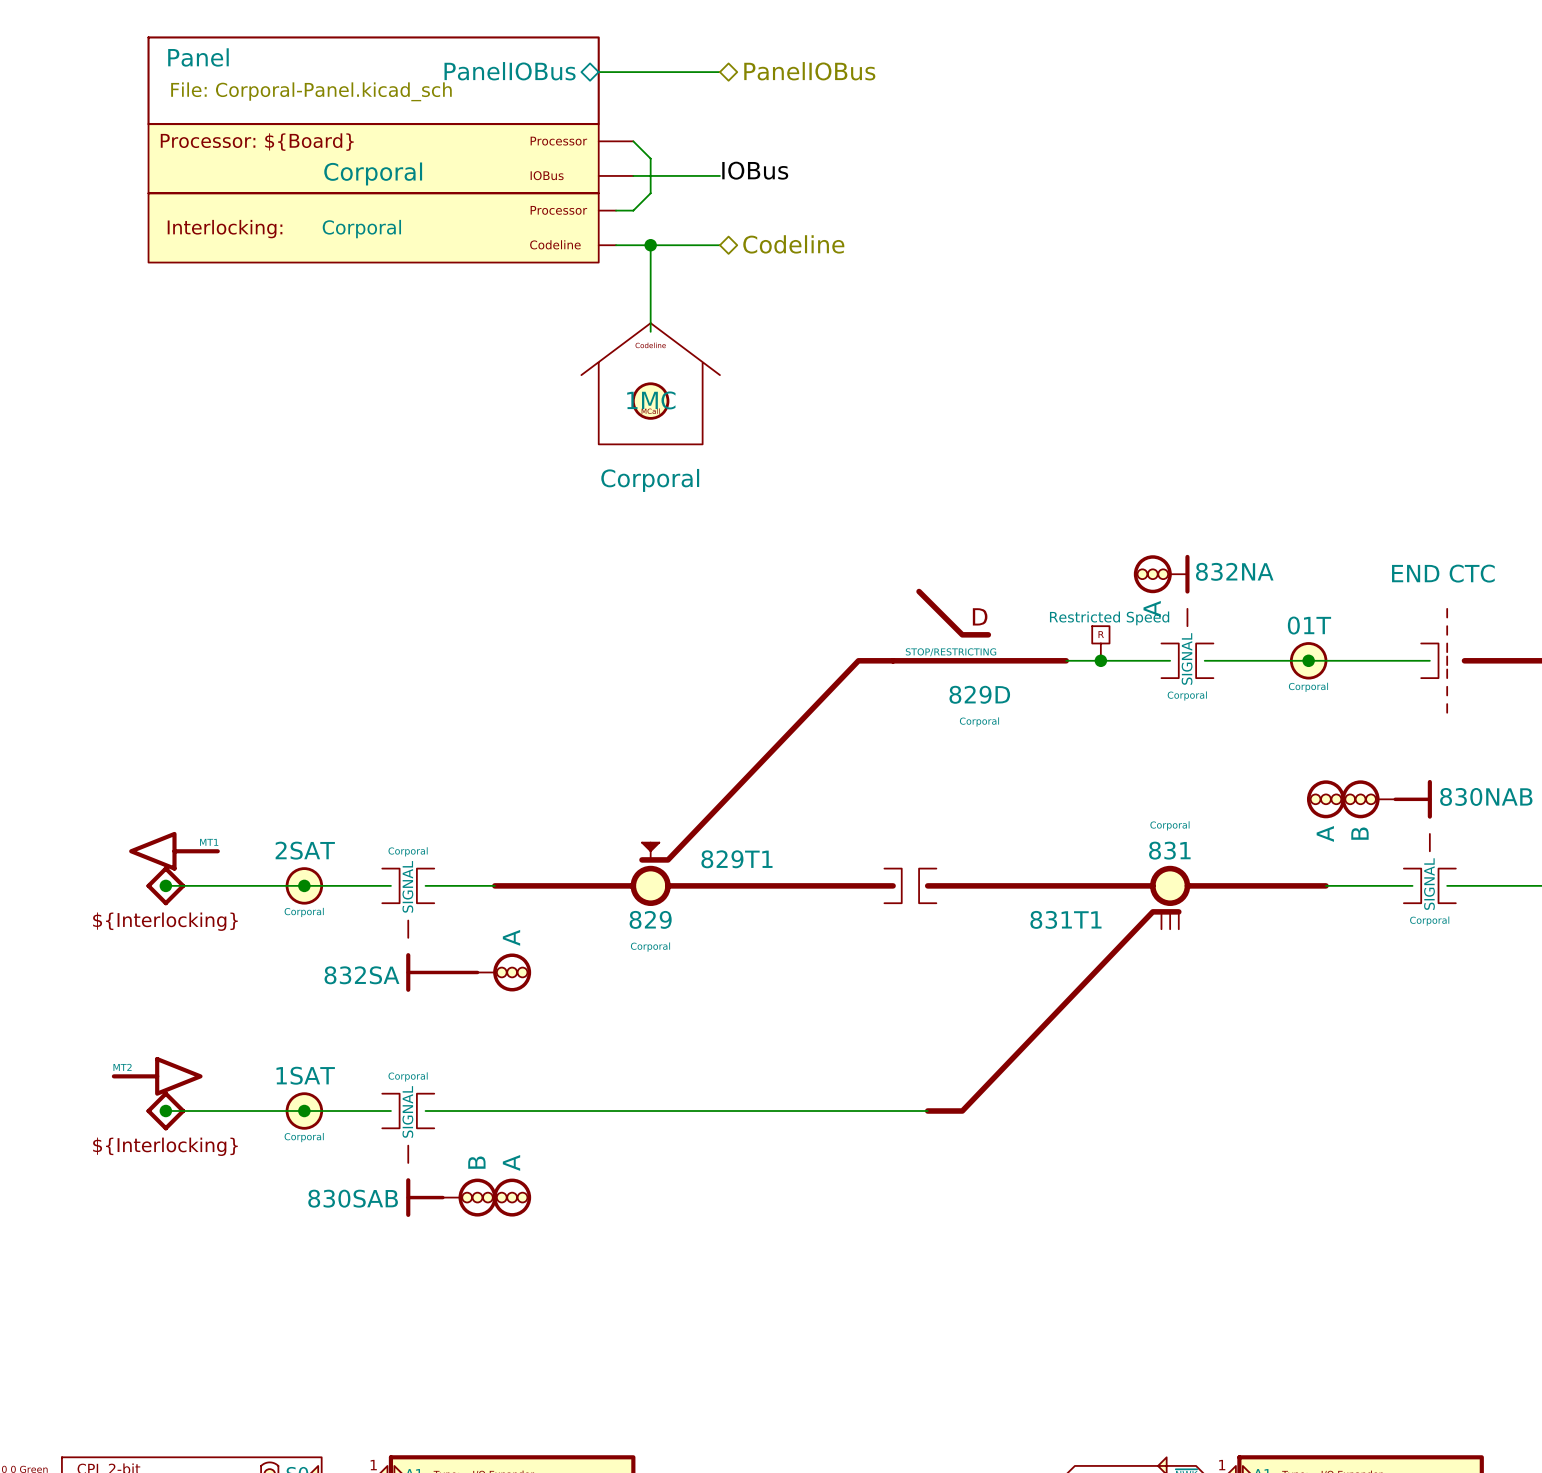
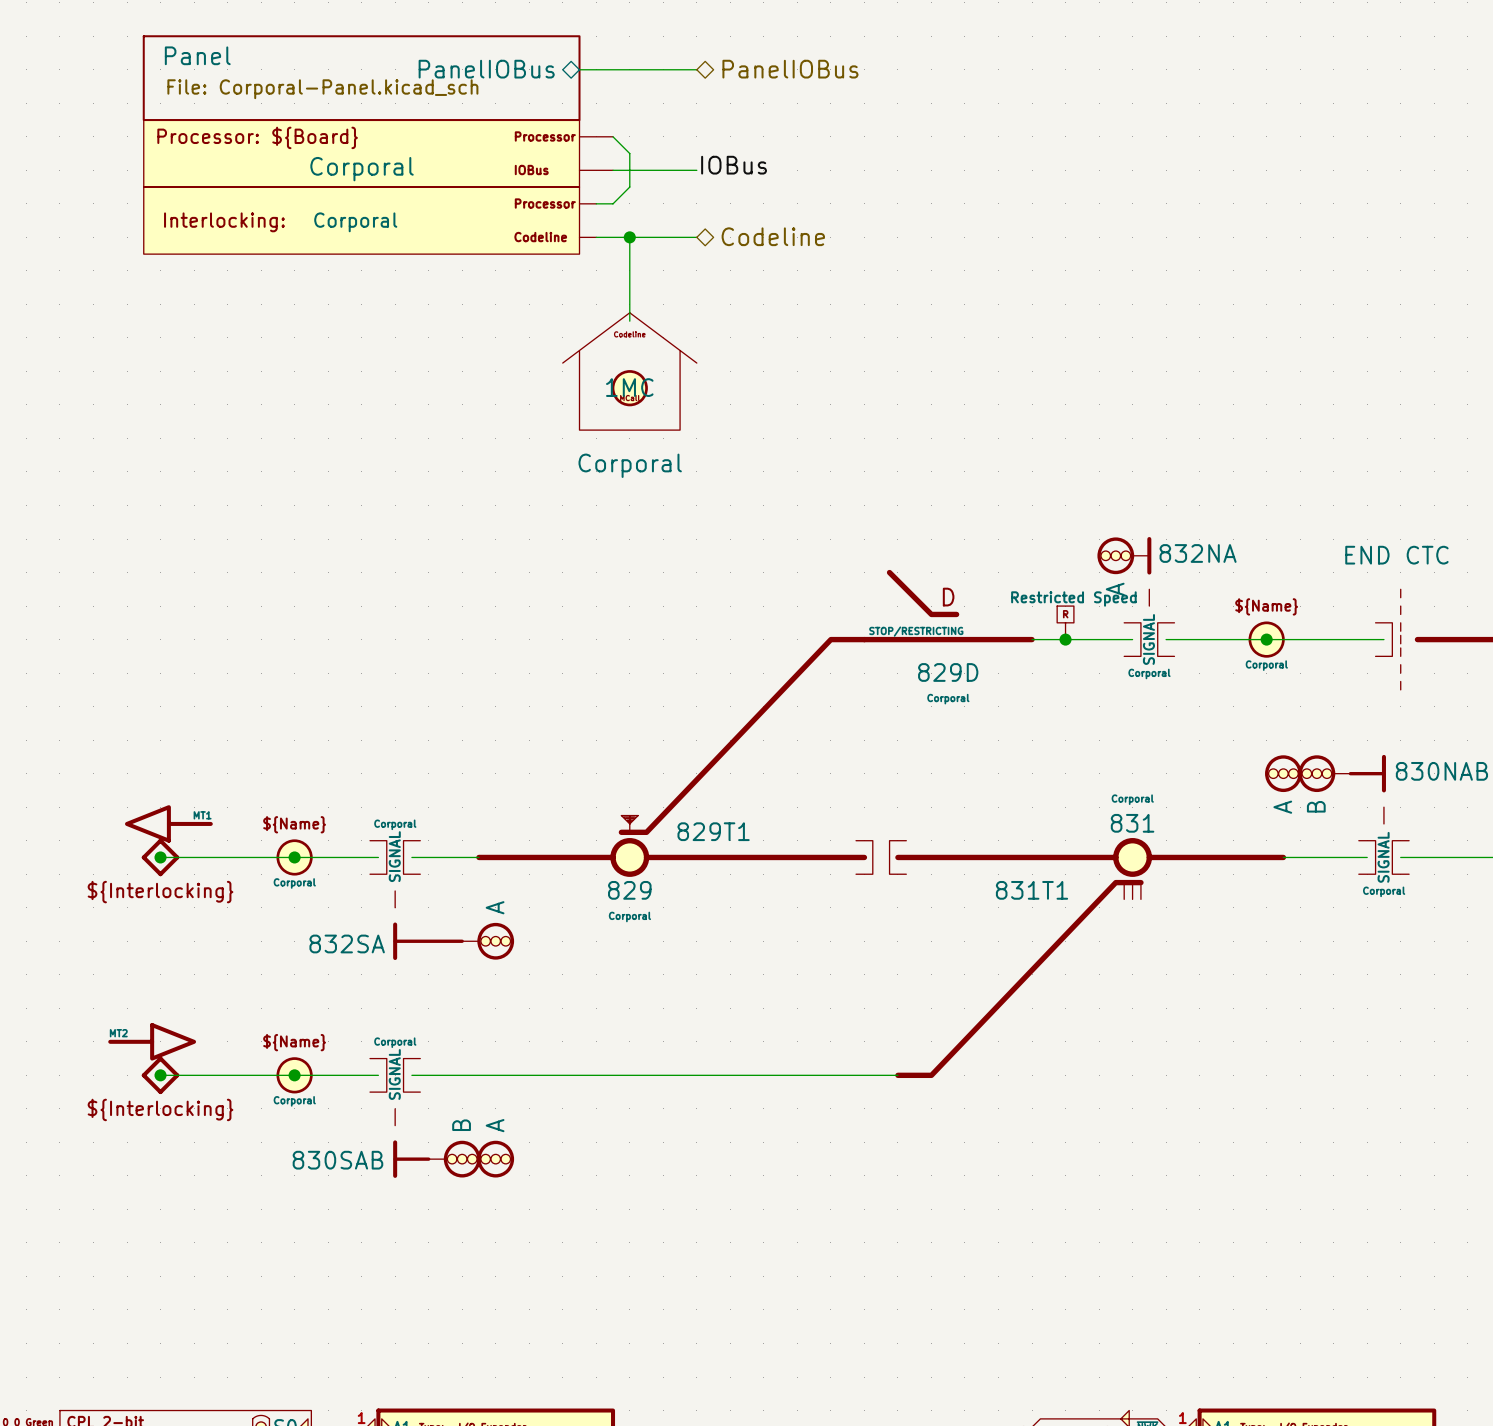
part value: 01T (1309, 625) -> none
part text: none -> ${Name} (1266, 606)
part value: 2SAT (305, 850) -> none
part text: none -> ${Name} (294, 824)
part value: 1SAT (305, 1075) -> none
part text: none -> ${Name} (294, 1042)

